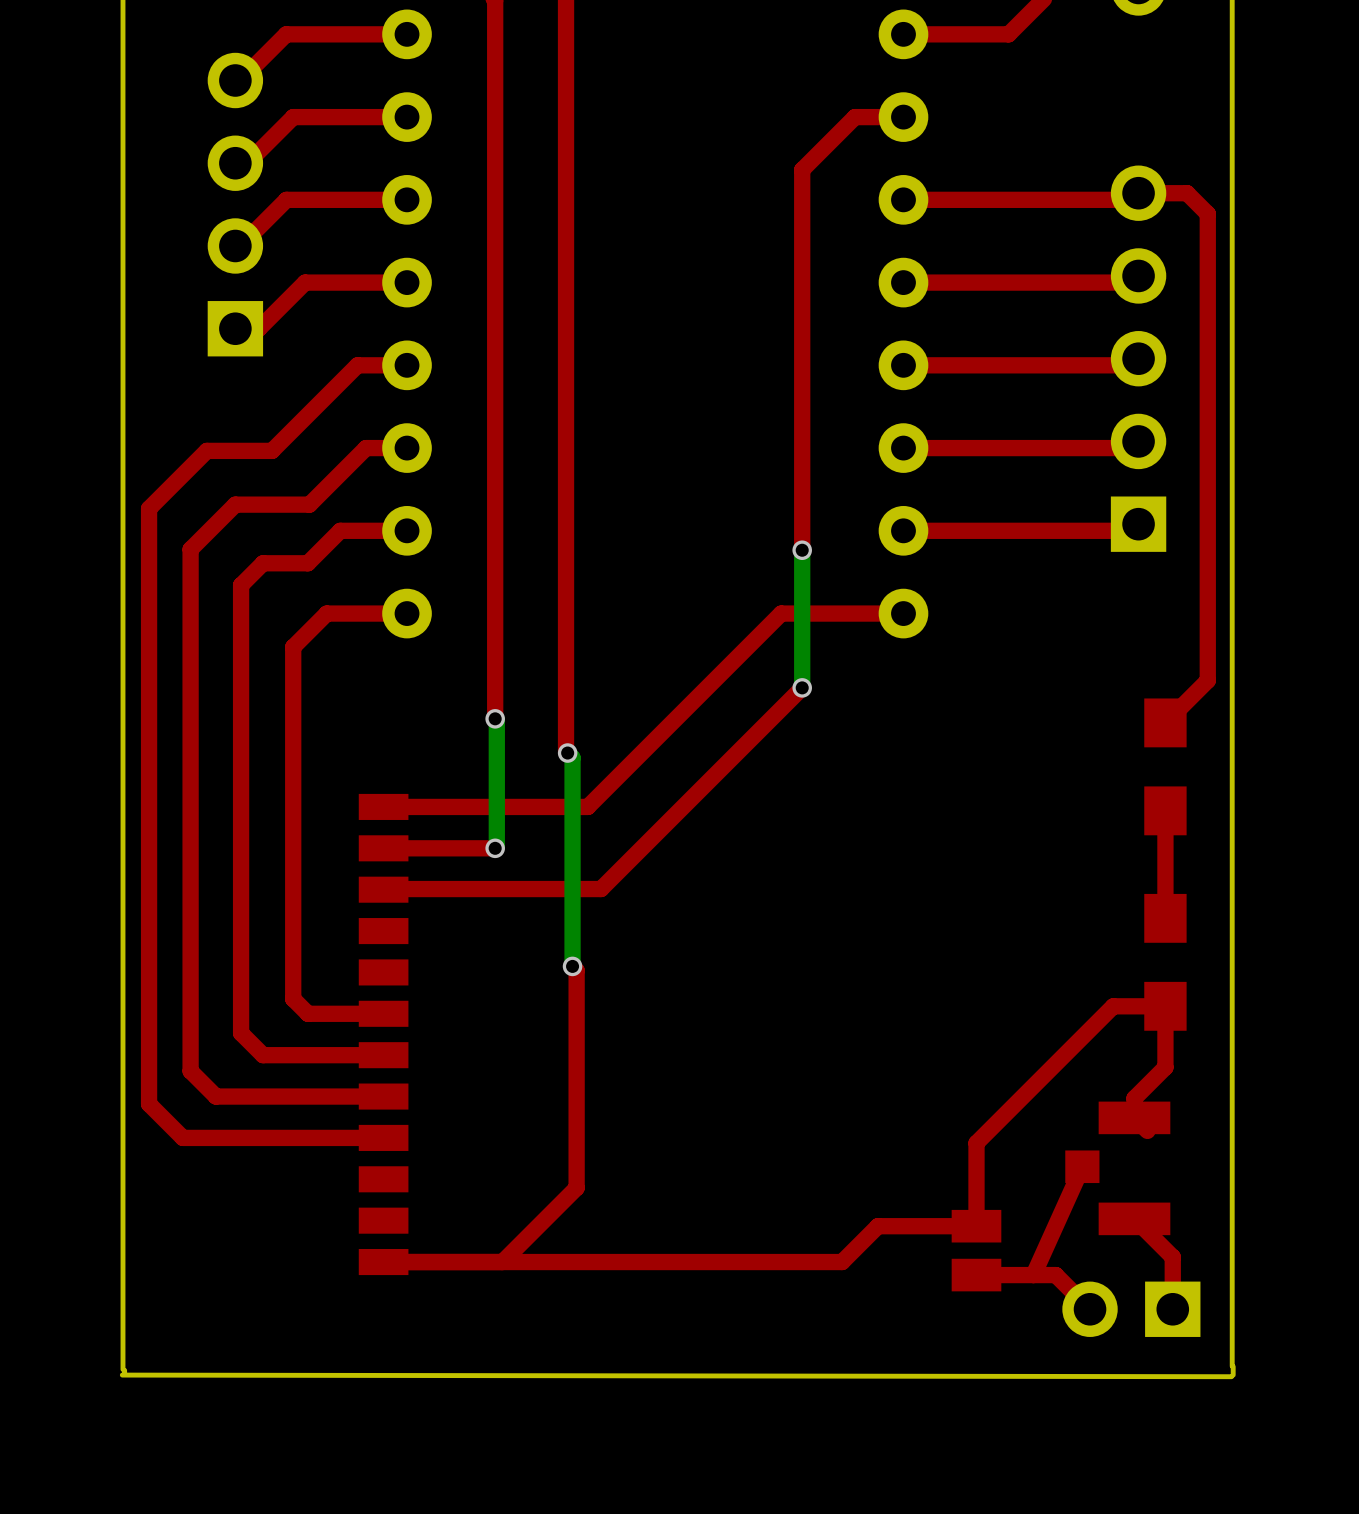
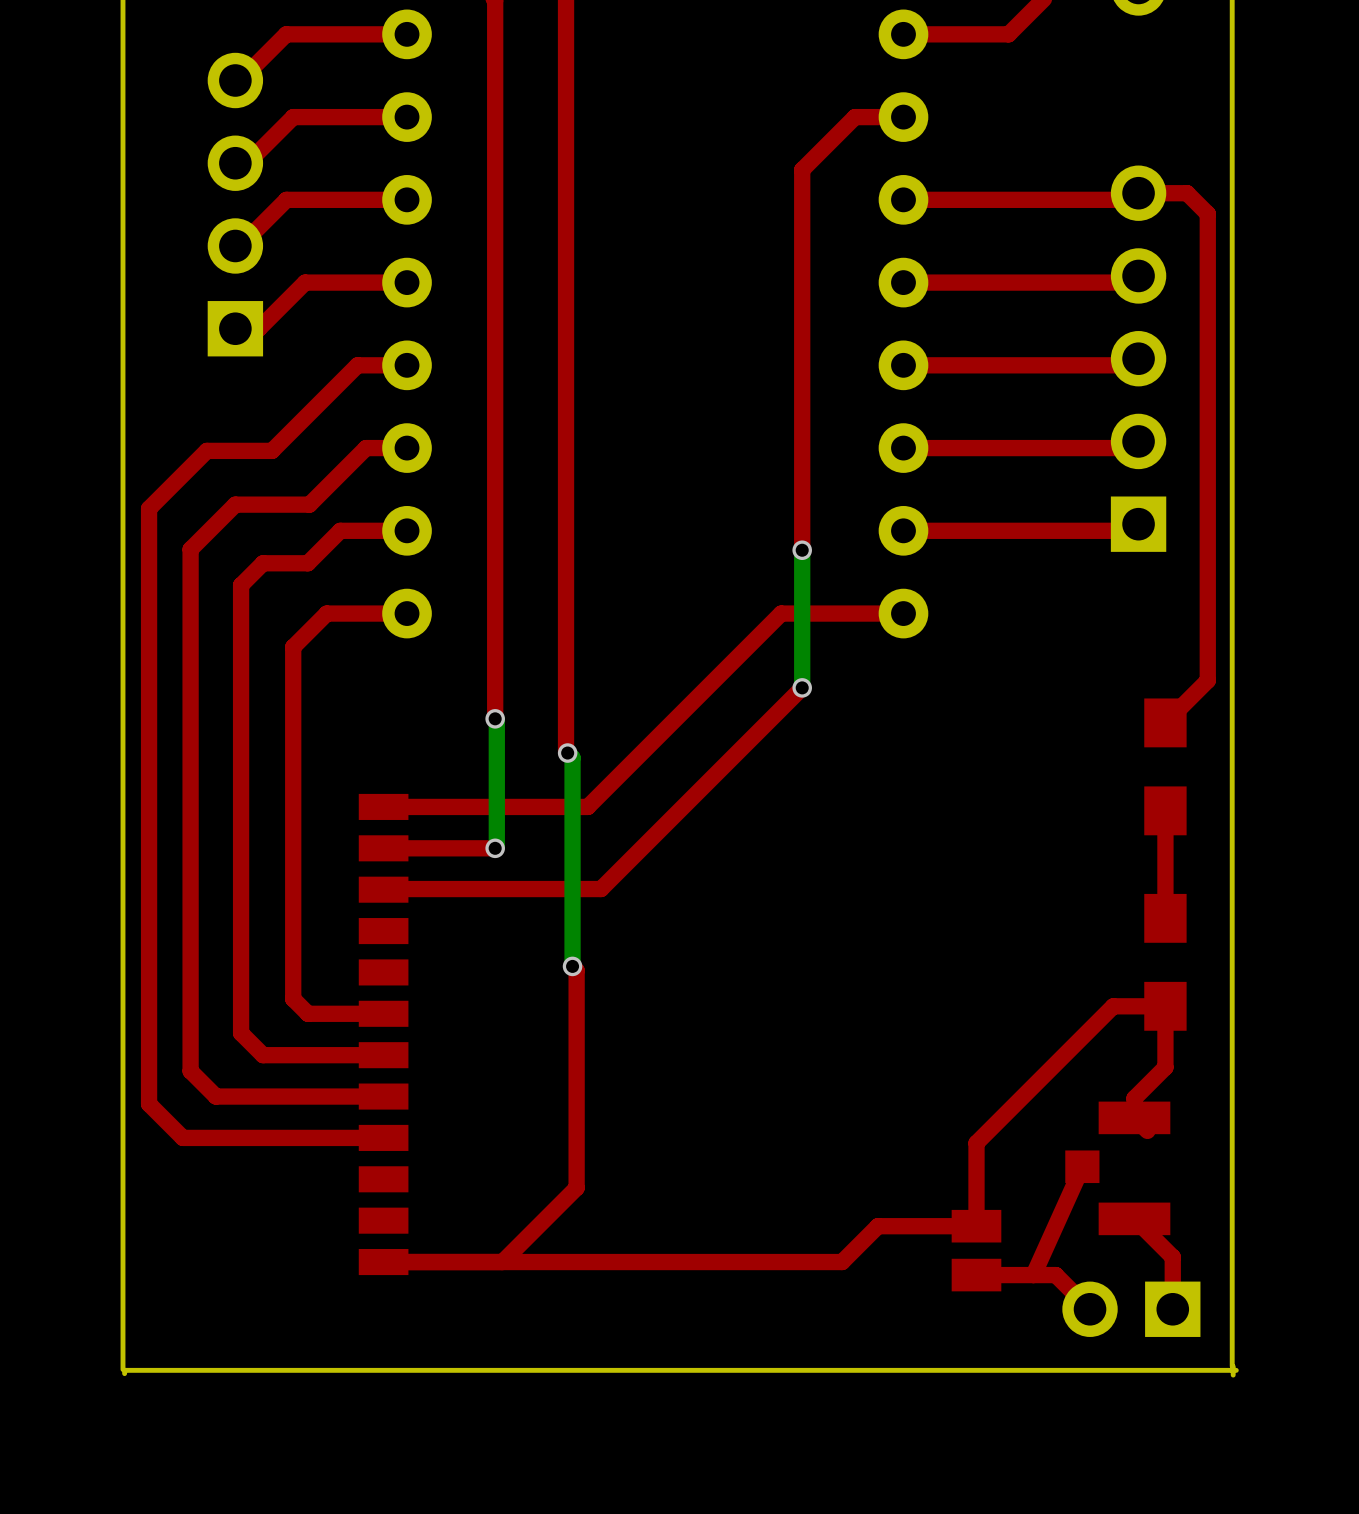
board edge: none -> (1236, 1370) (124, 1370)
board edge: (122, 1375) (1231, 1376) -> none

